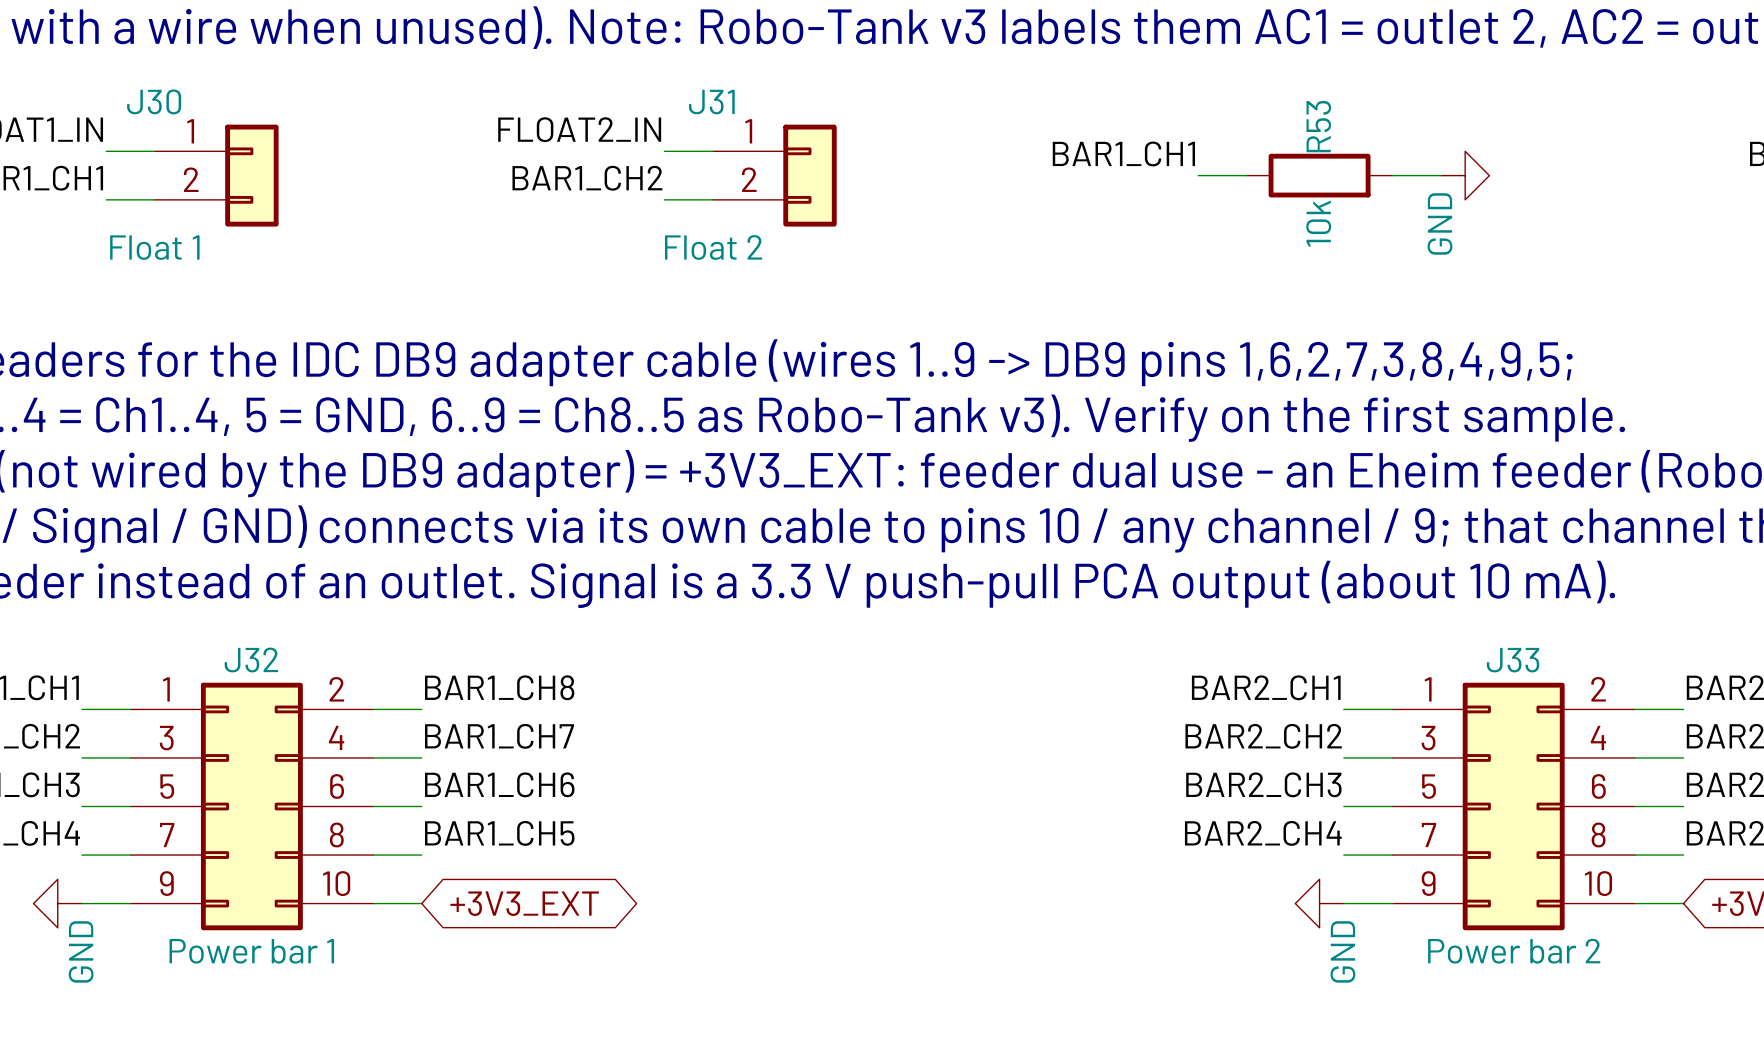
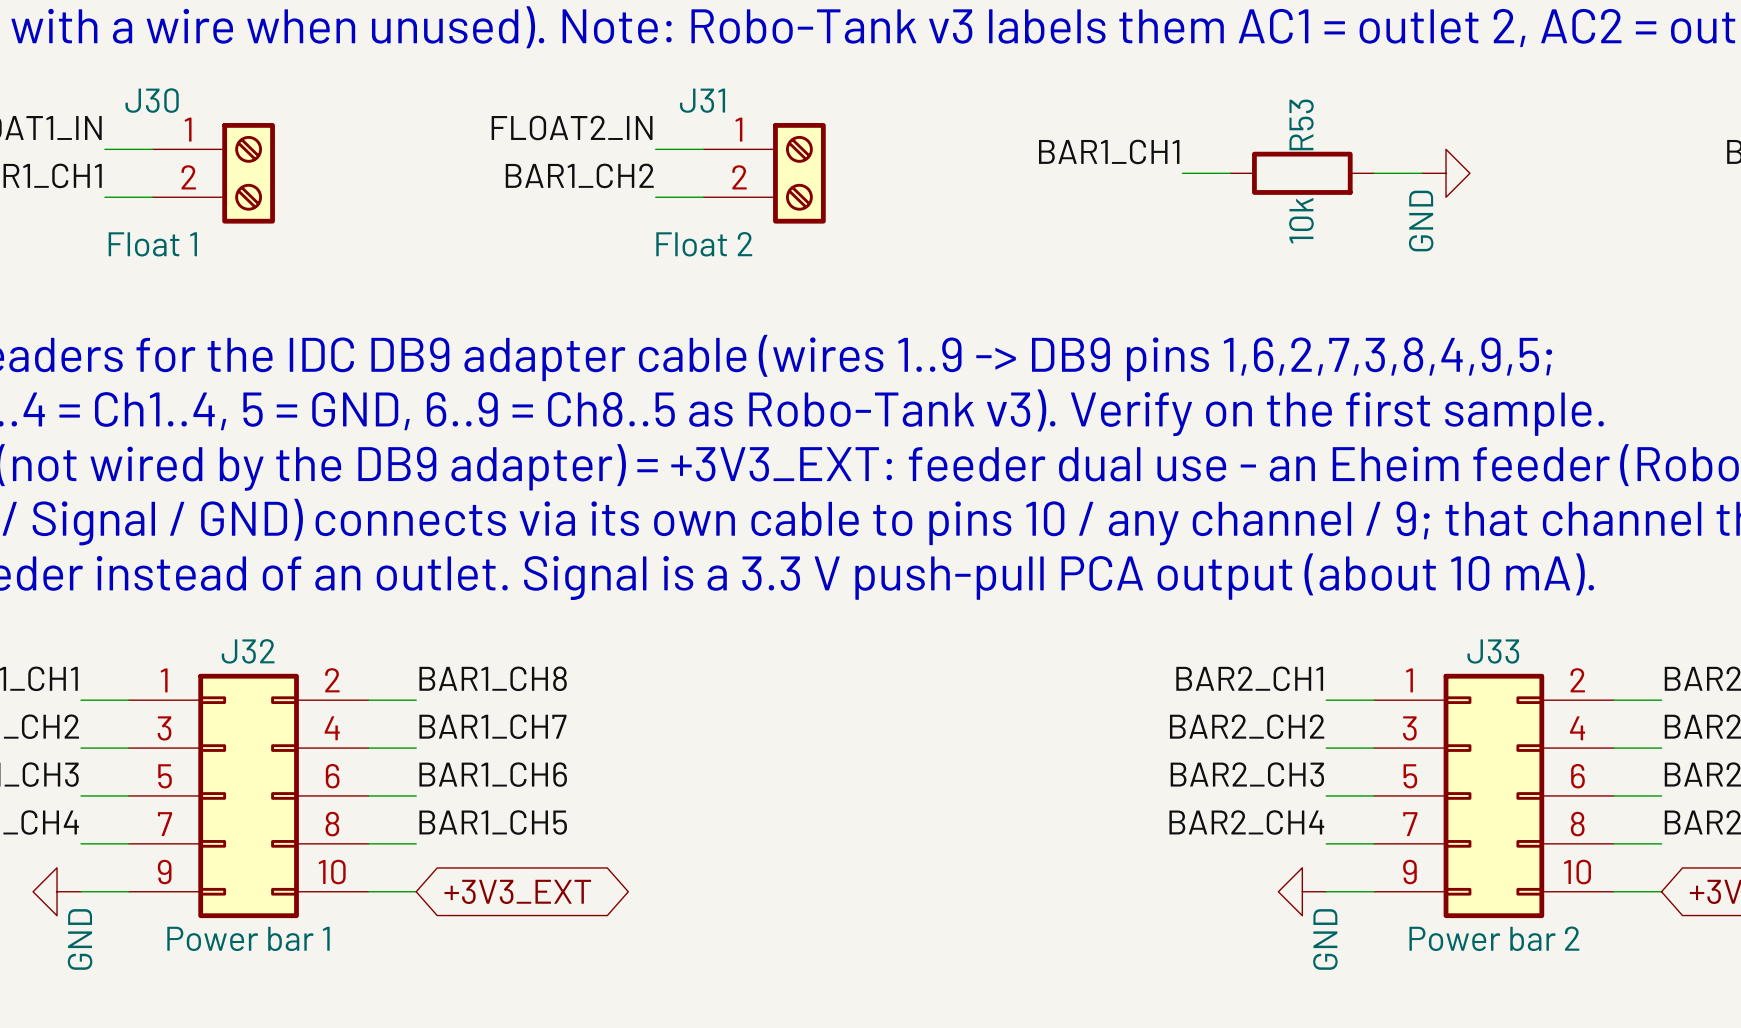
J30 symbol: [154, 124, 279, 227] -> [152, 123, 275, 224]
J31 symbol: [712, 124, 837, 227] -> [703, 123, 826, 224]

